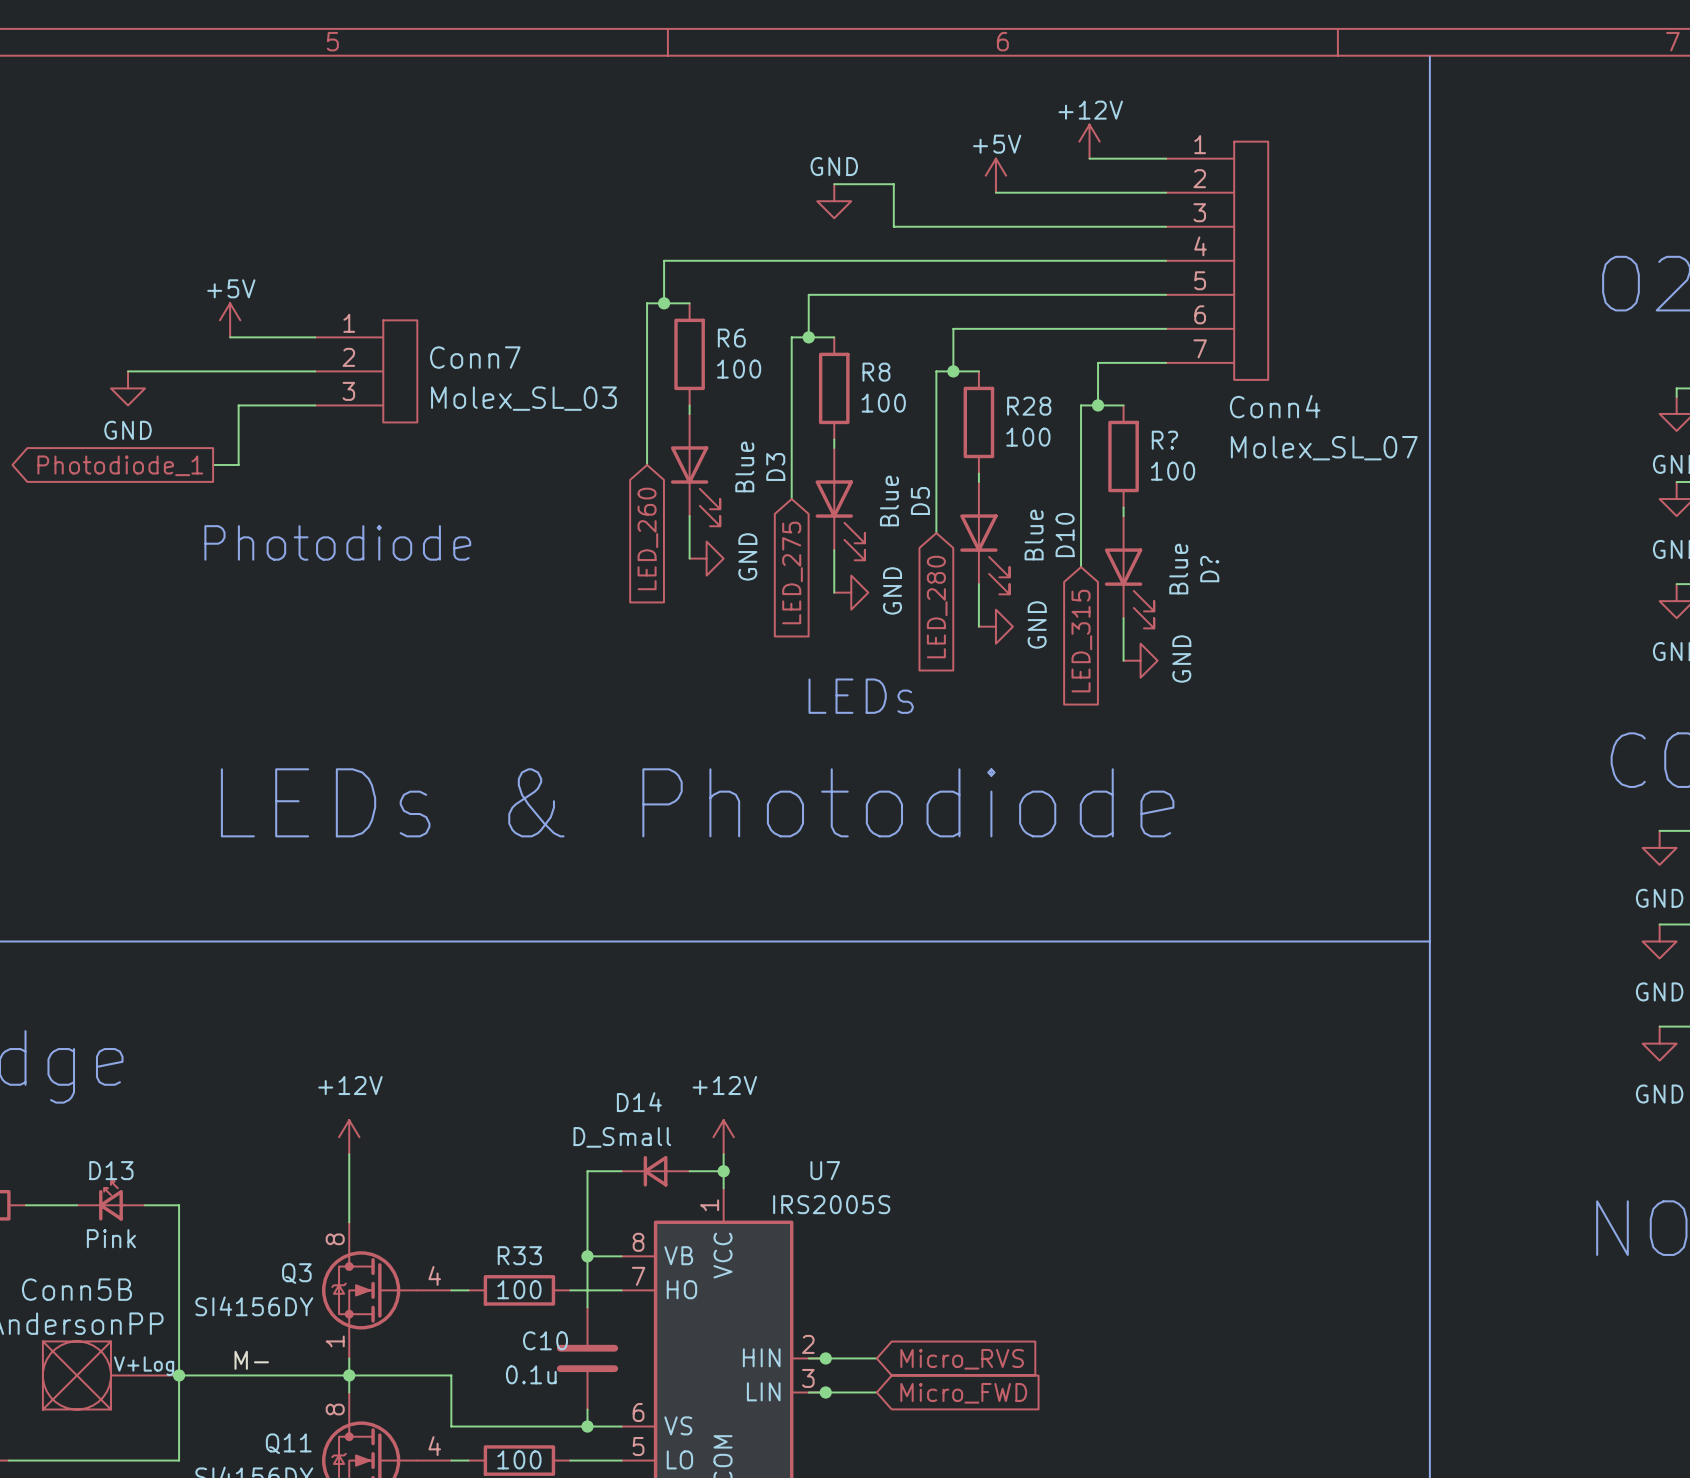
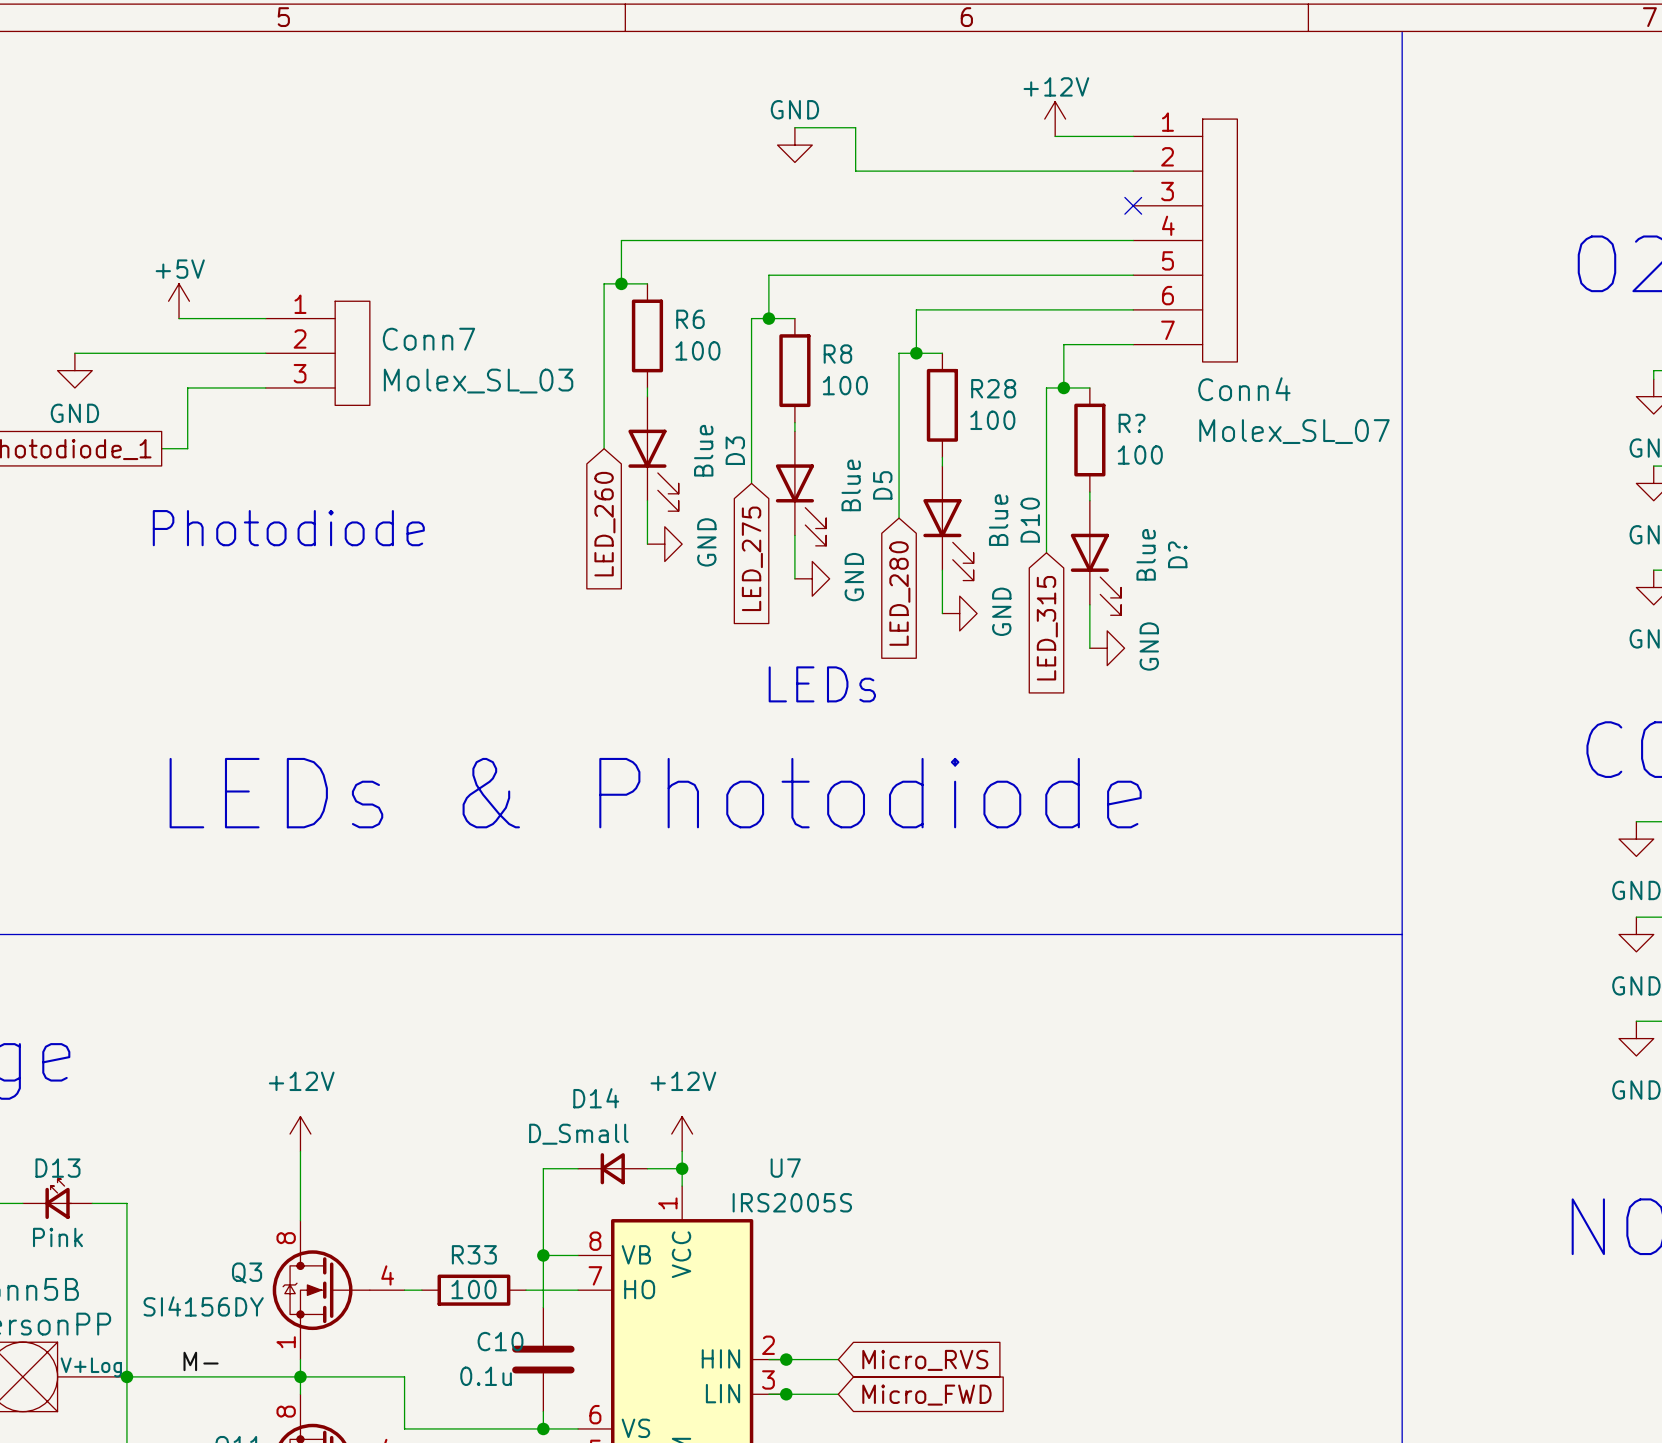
power symbol: +5V (995, 175) -> none
wire: (834, 184) (893, 184) -> (794, 127) (855, 127) (855, 162)
wire: (893, 192) (893, 226) (1166, 226) -> (855, 171) (959, 171)
power symbol position: GND (834, 201) -> GND (794, 145)
no-connect mark: none -> (1133, 205)

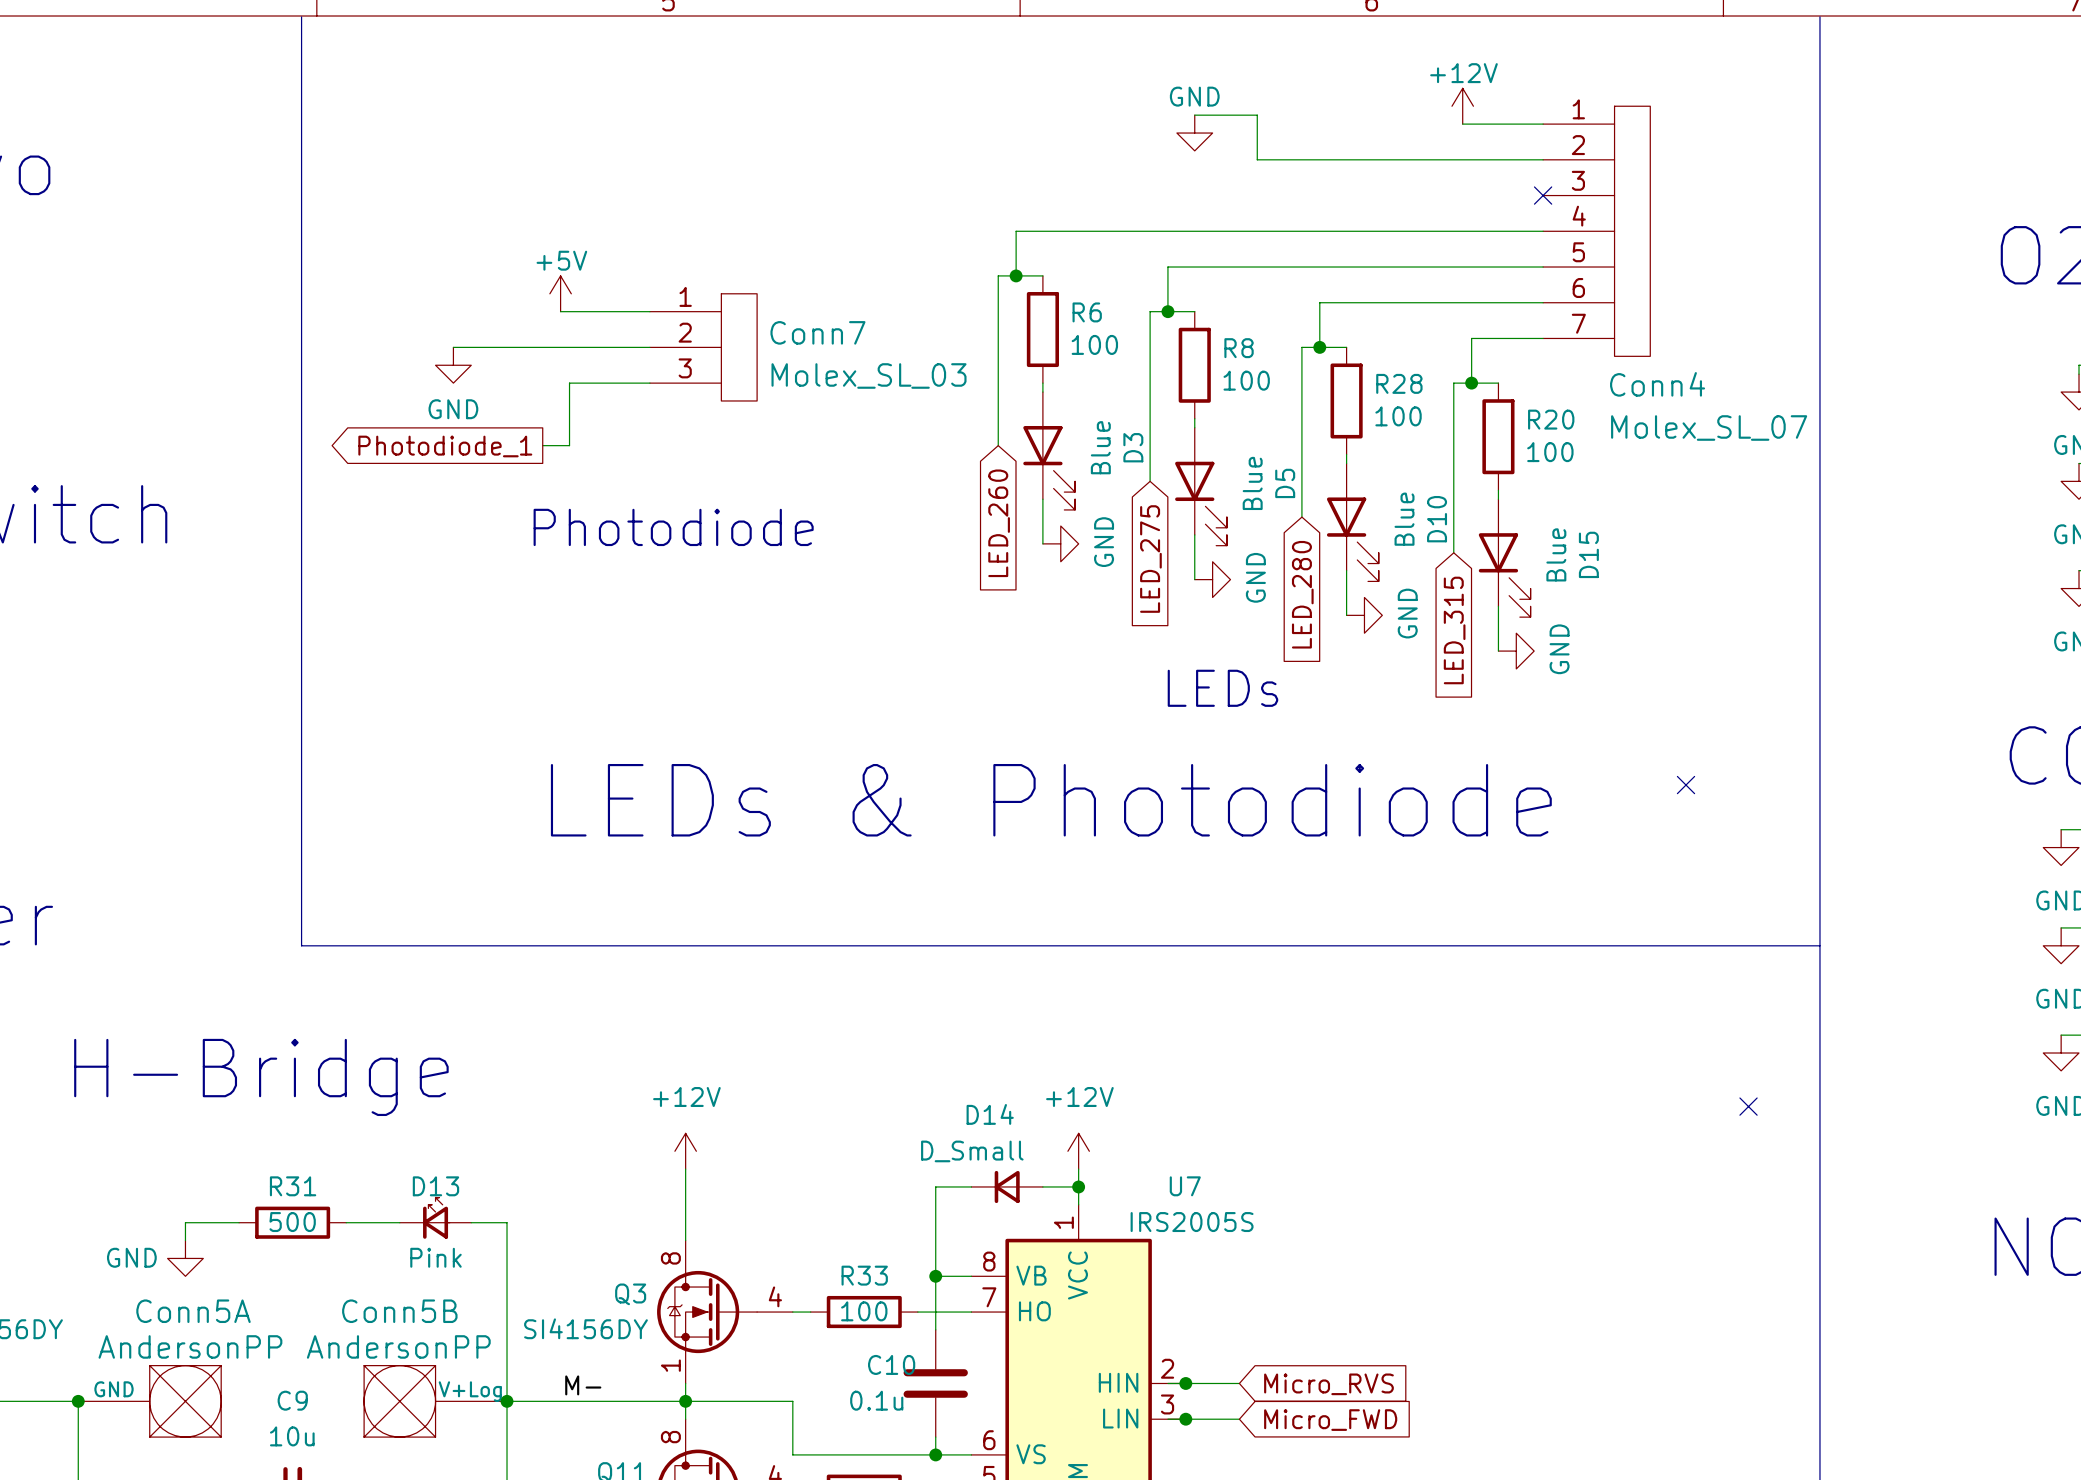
R? name: R? (1132, 423) -> R20 (1551, 419)
D? name: D? (1177, 554) -> D15 (1588, 554)
no-connect mark: none -> (1686, 785)
no-connect mark: none -> (1748, 1106)

